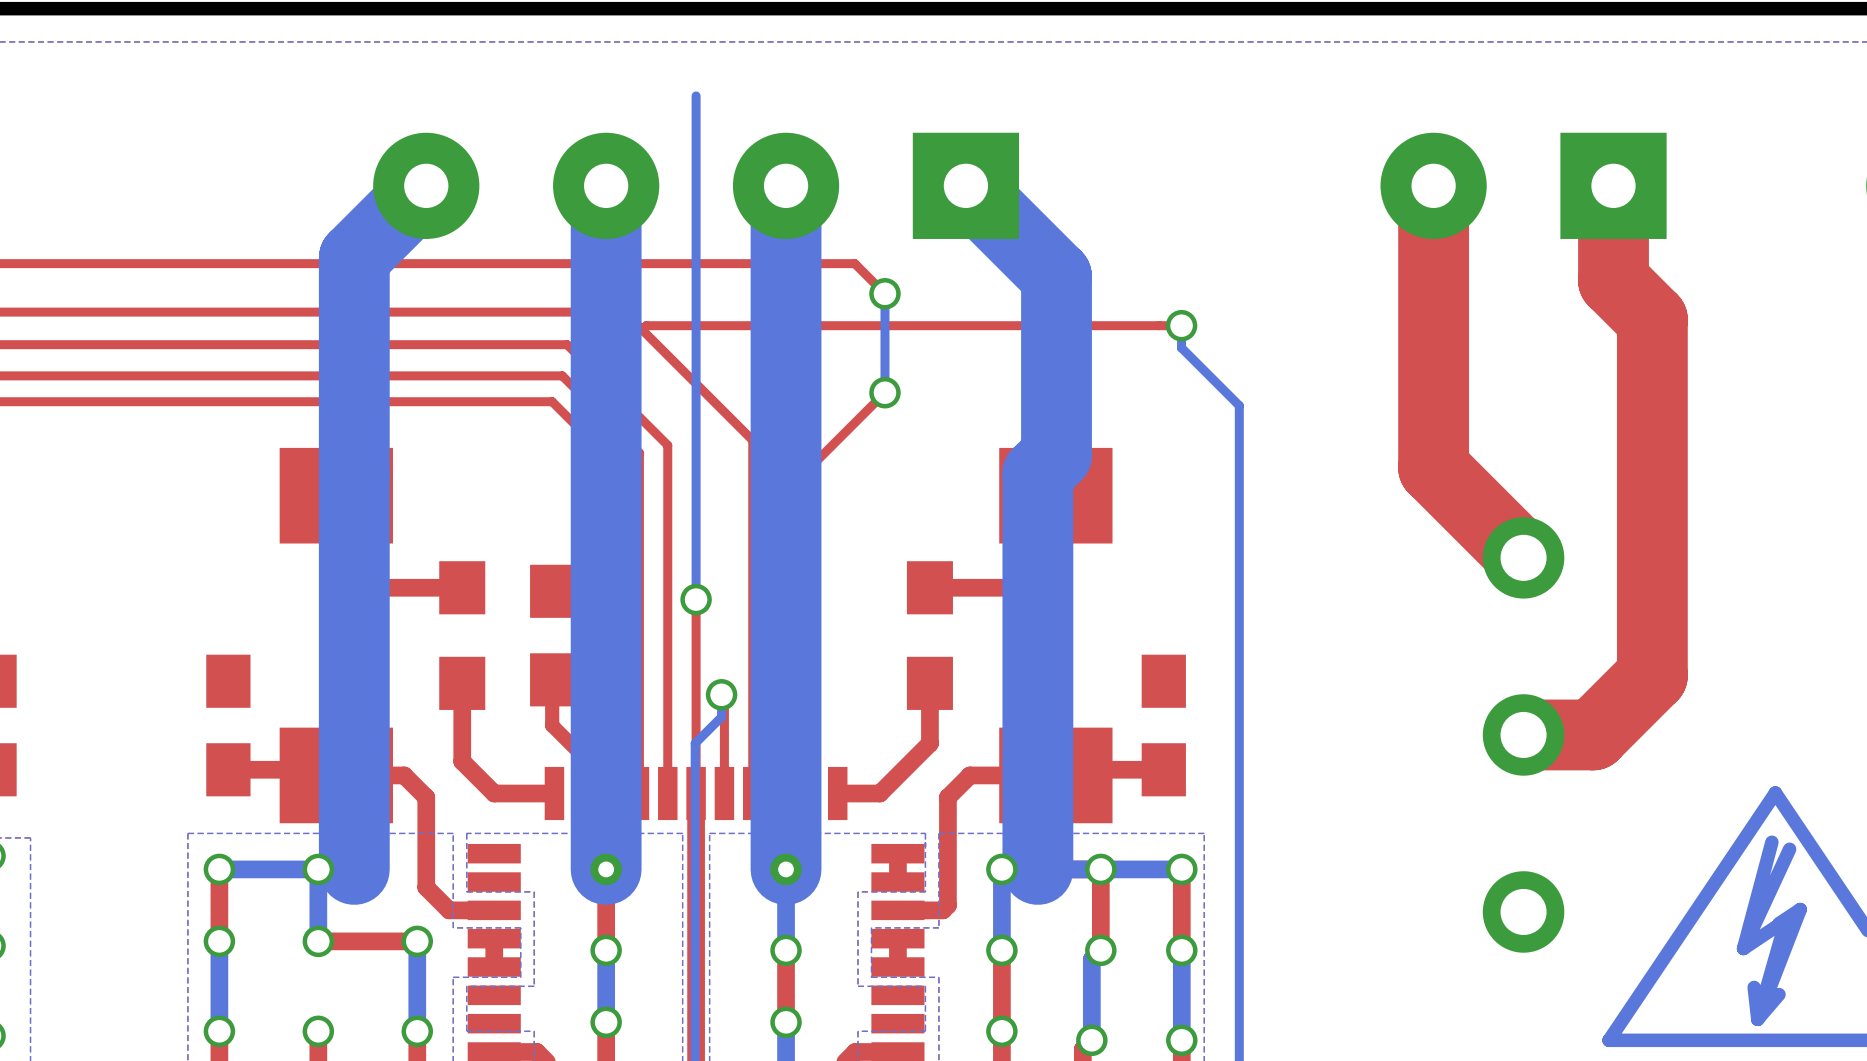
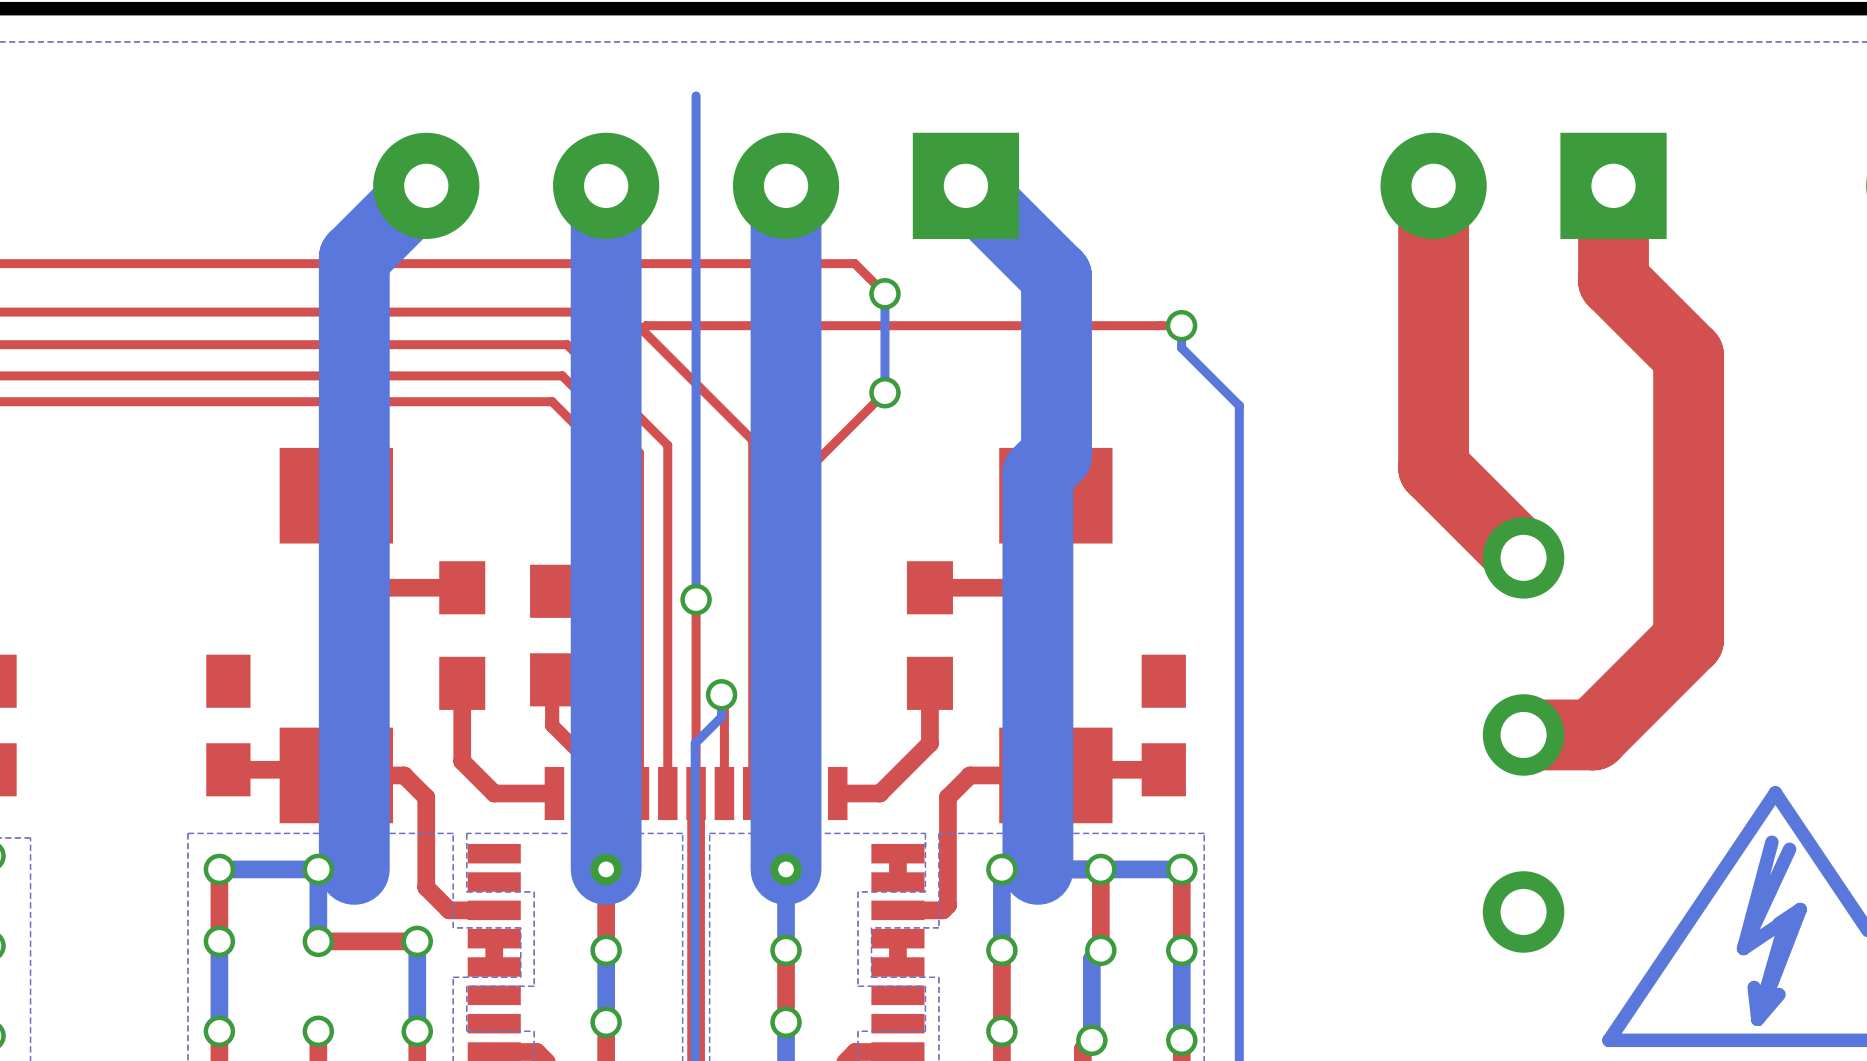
top track: (1652, 319) (1652, 675) -> (1652, 319) (1688, 355) (1688, 639) (1652, 675)

